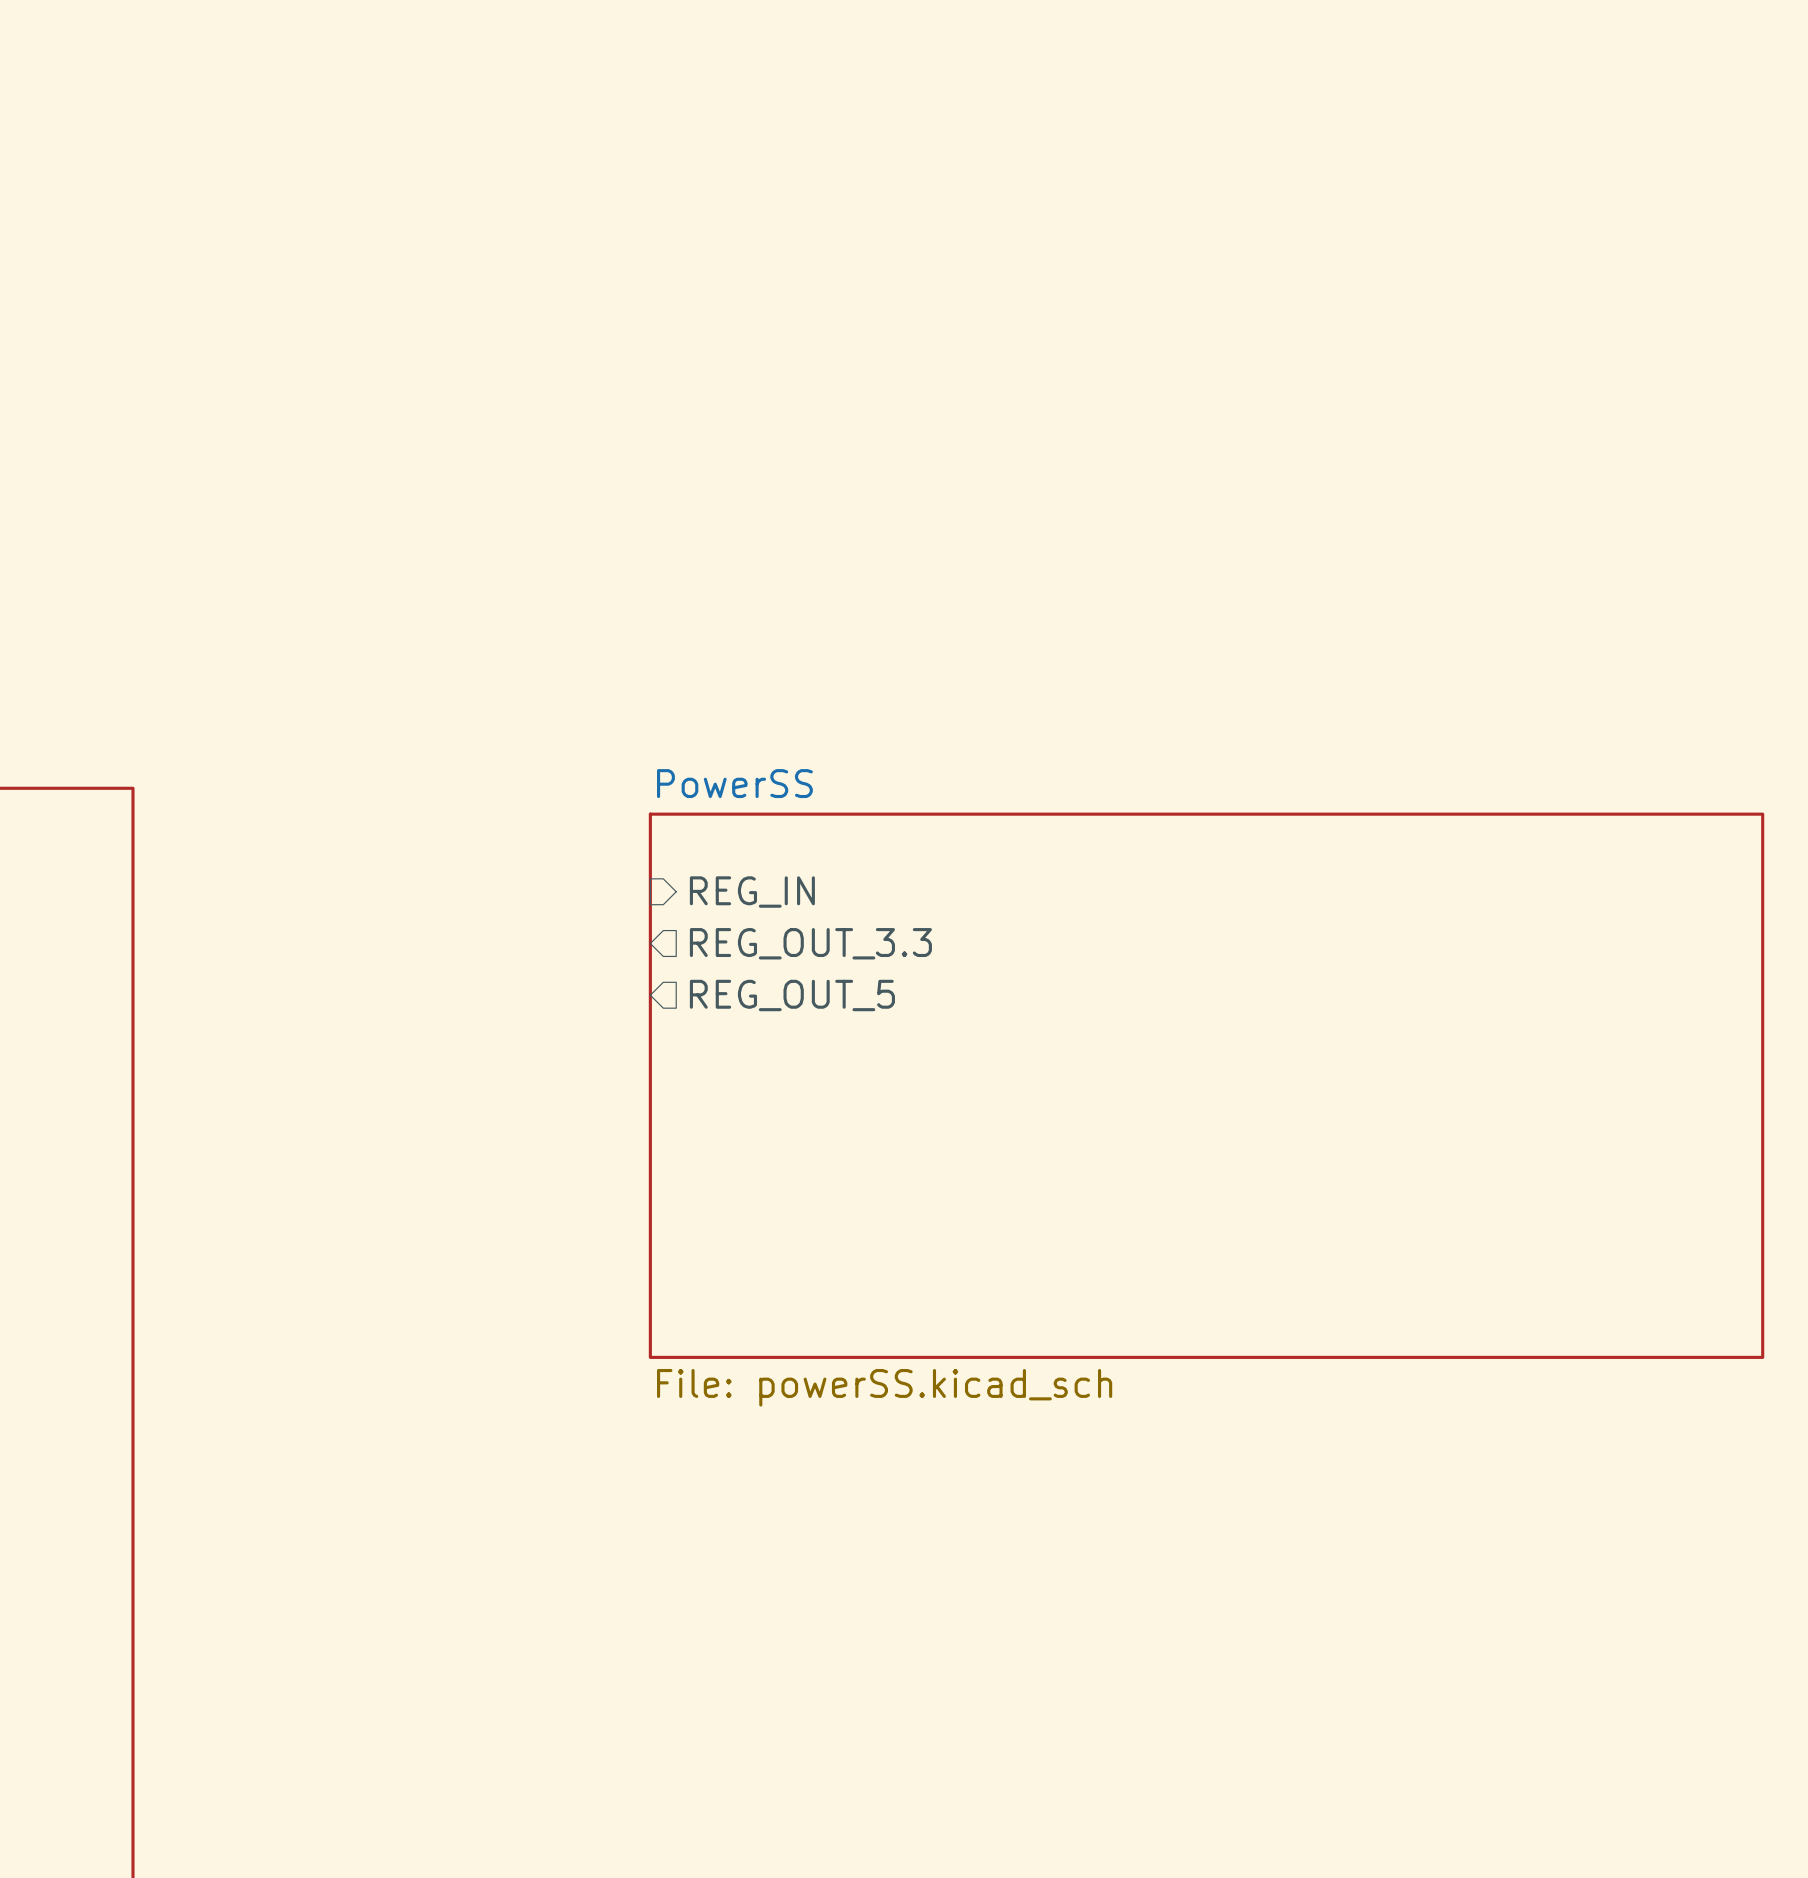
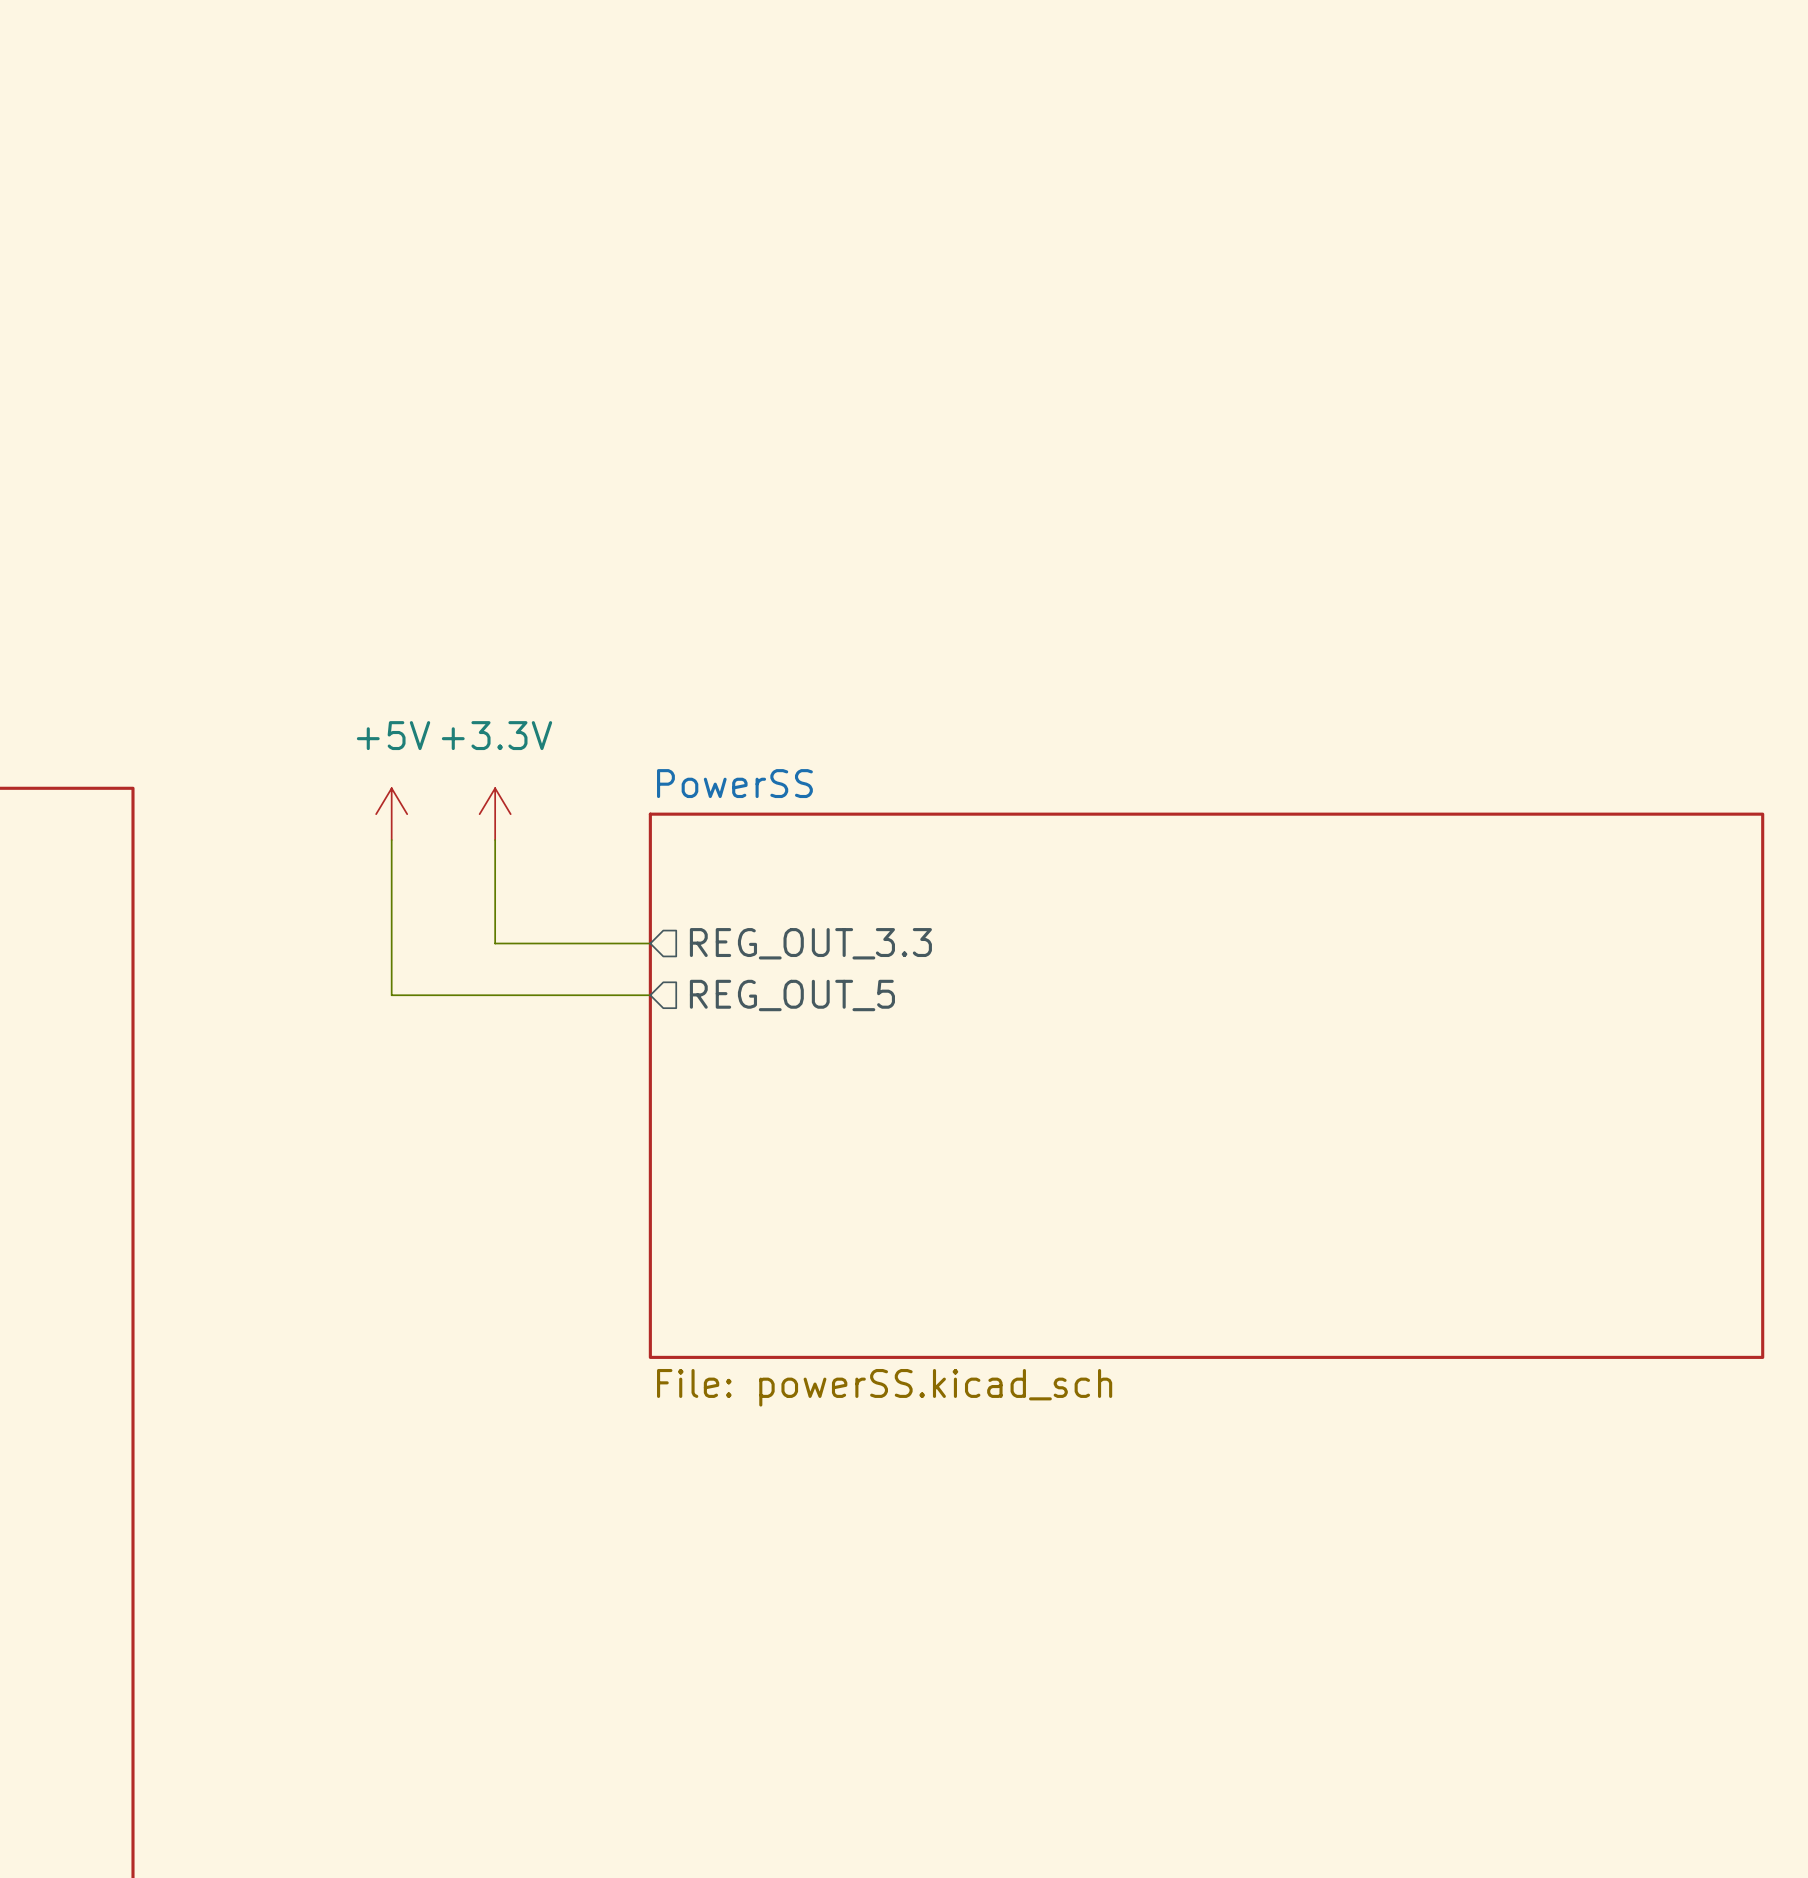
power symbol: none -> +5V (391, 814)
power symbol: none -> +3.3V (495, 814)
wire: none -> (391, 840) (391, 995) (650, 995)
wire: none -> (495, 840) (495, 943) (650, 943)
sheet pin: REG_IN (752, 892) -> none

